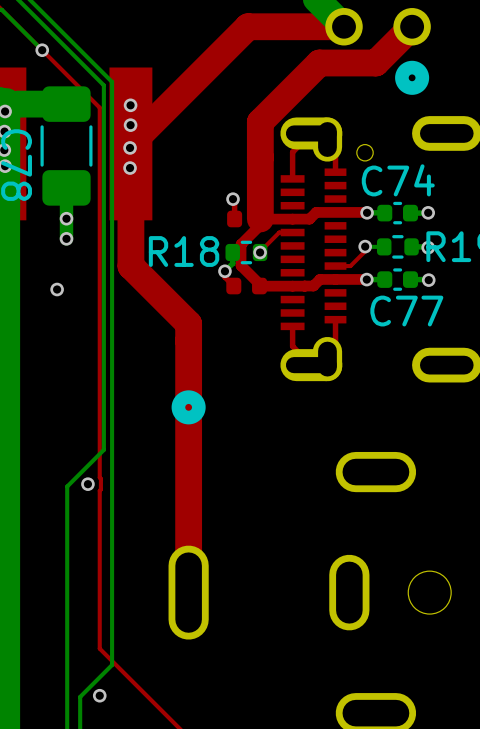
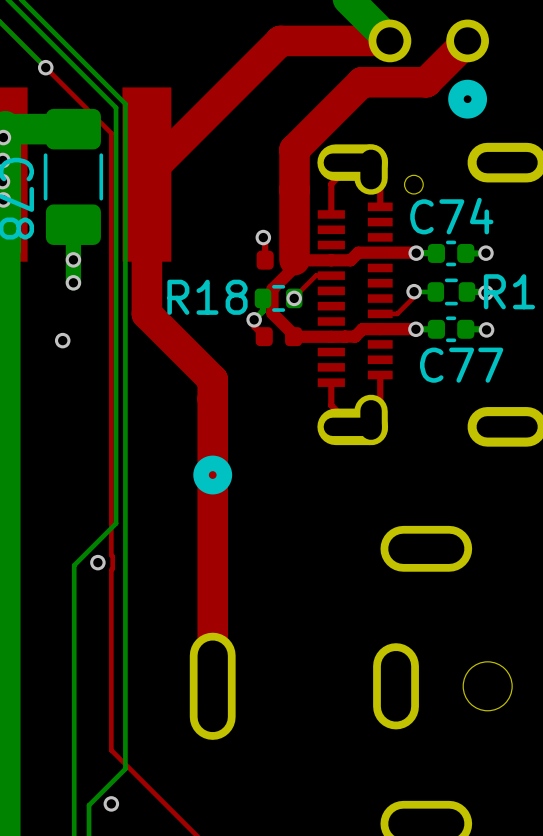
via: (130, 105) -> none
via: (130, 125) -> none
via: (130, 147) -> none
via: (130, 168) -> none

